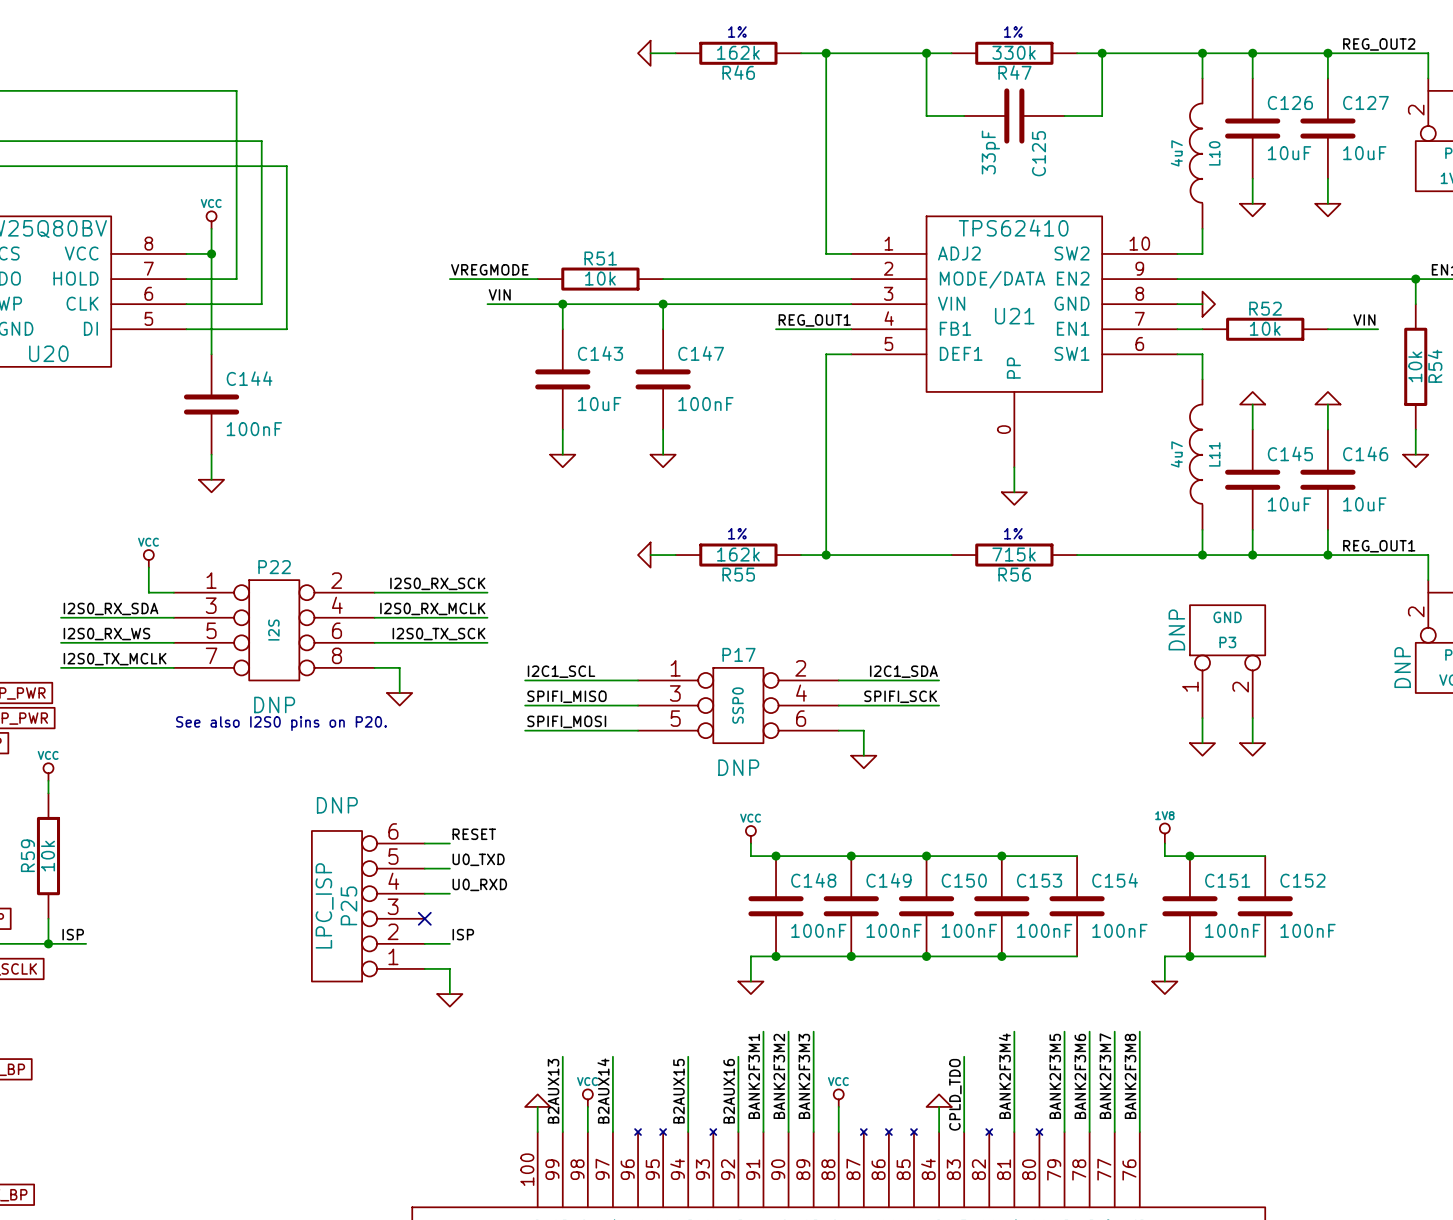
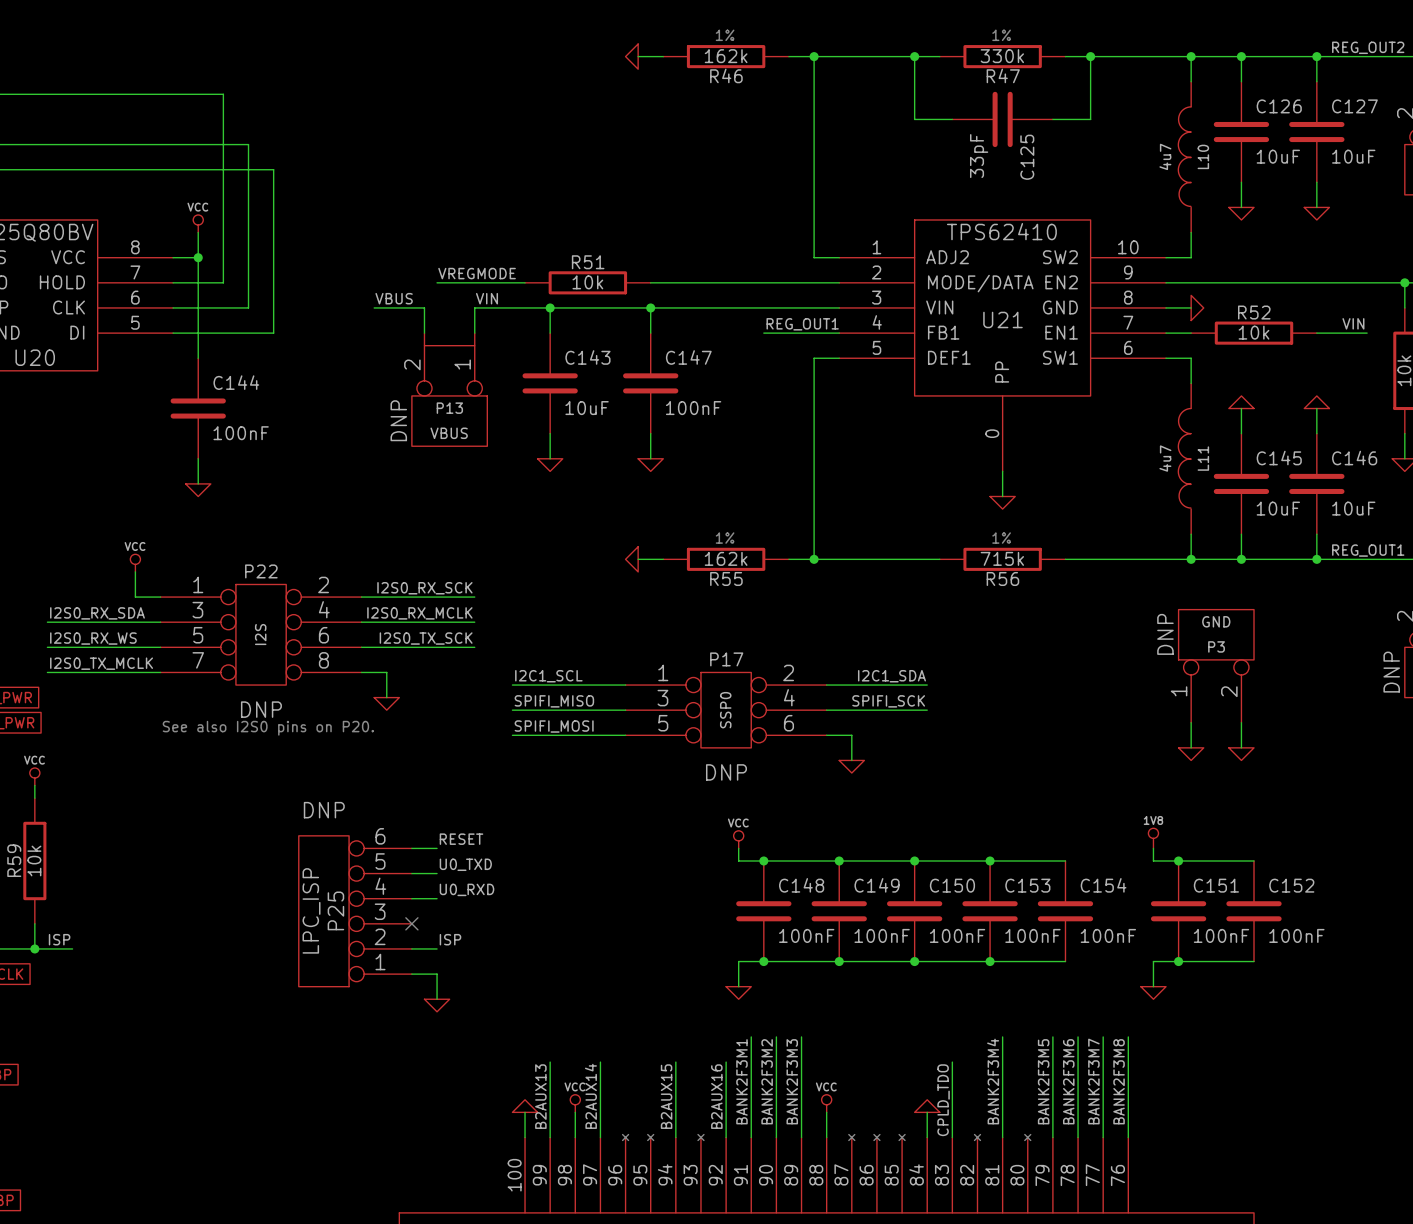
label: none -> VBUS (394, 298)
wire: none -> (374, 307) (424, 307) (424, 333)
wire: none -> (474, 307) (474, 333)
P13: none -> VBUS (449, 389)

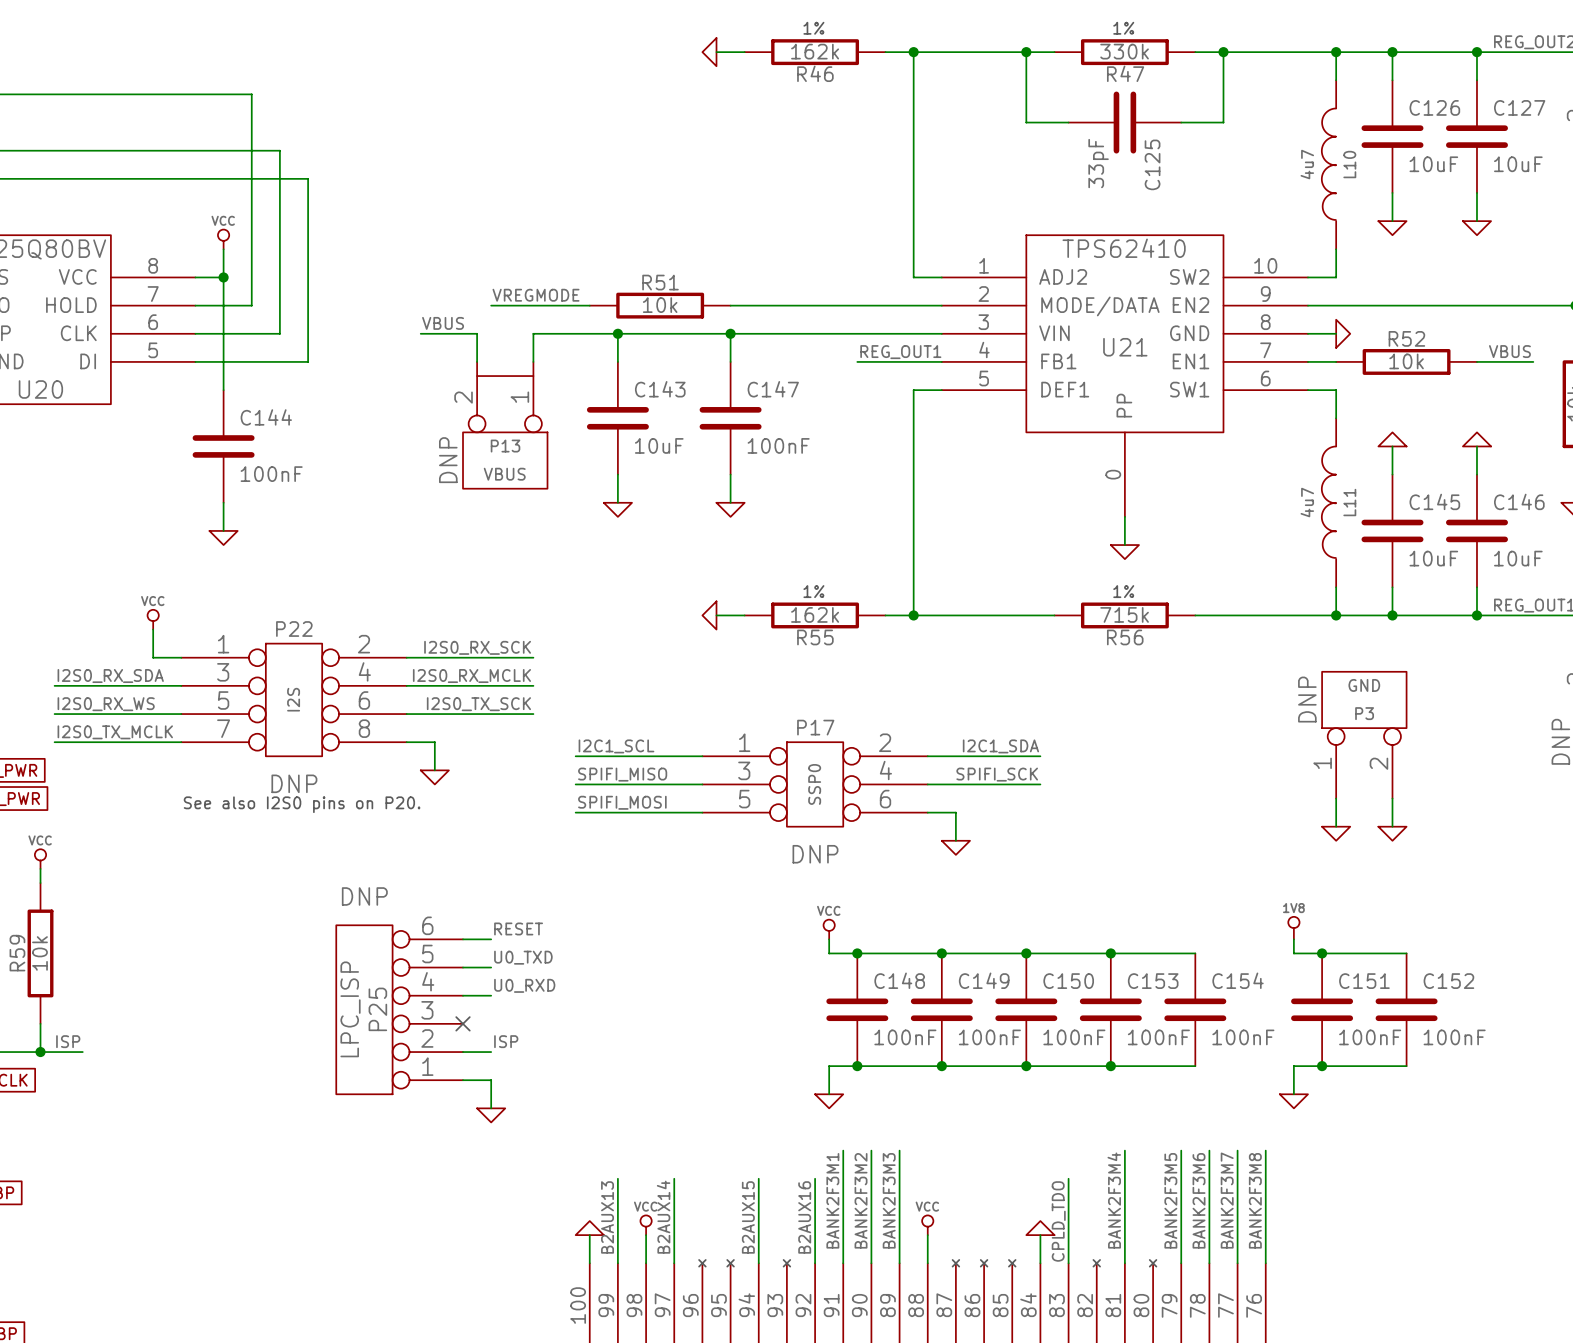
label: VIN (486, 298) -> none
label: VIN (1353, 323) -> VBUS (1509, 351)

